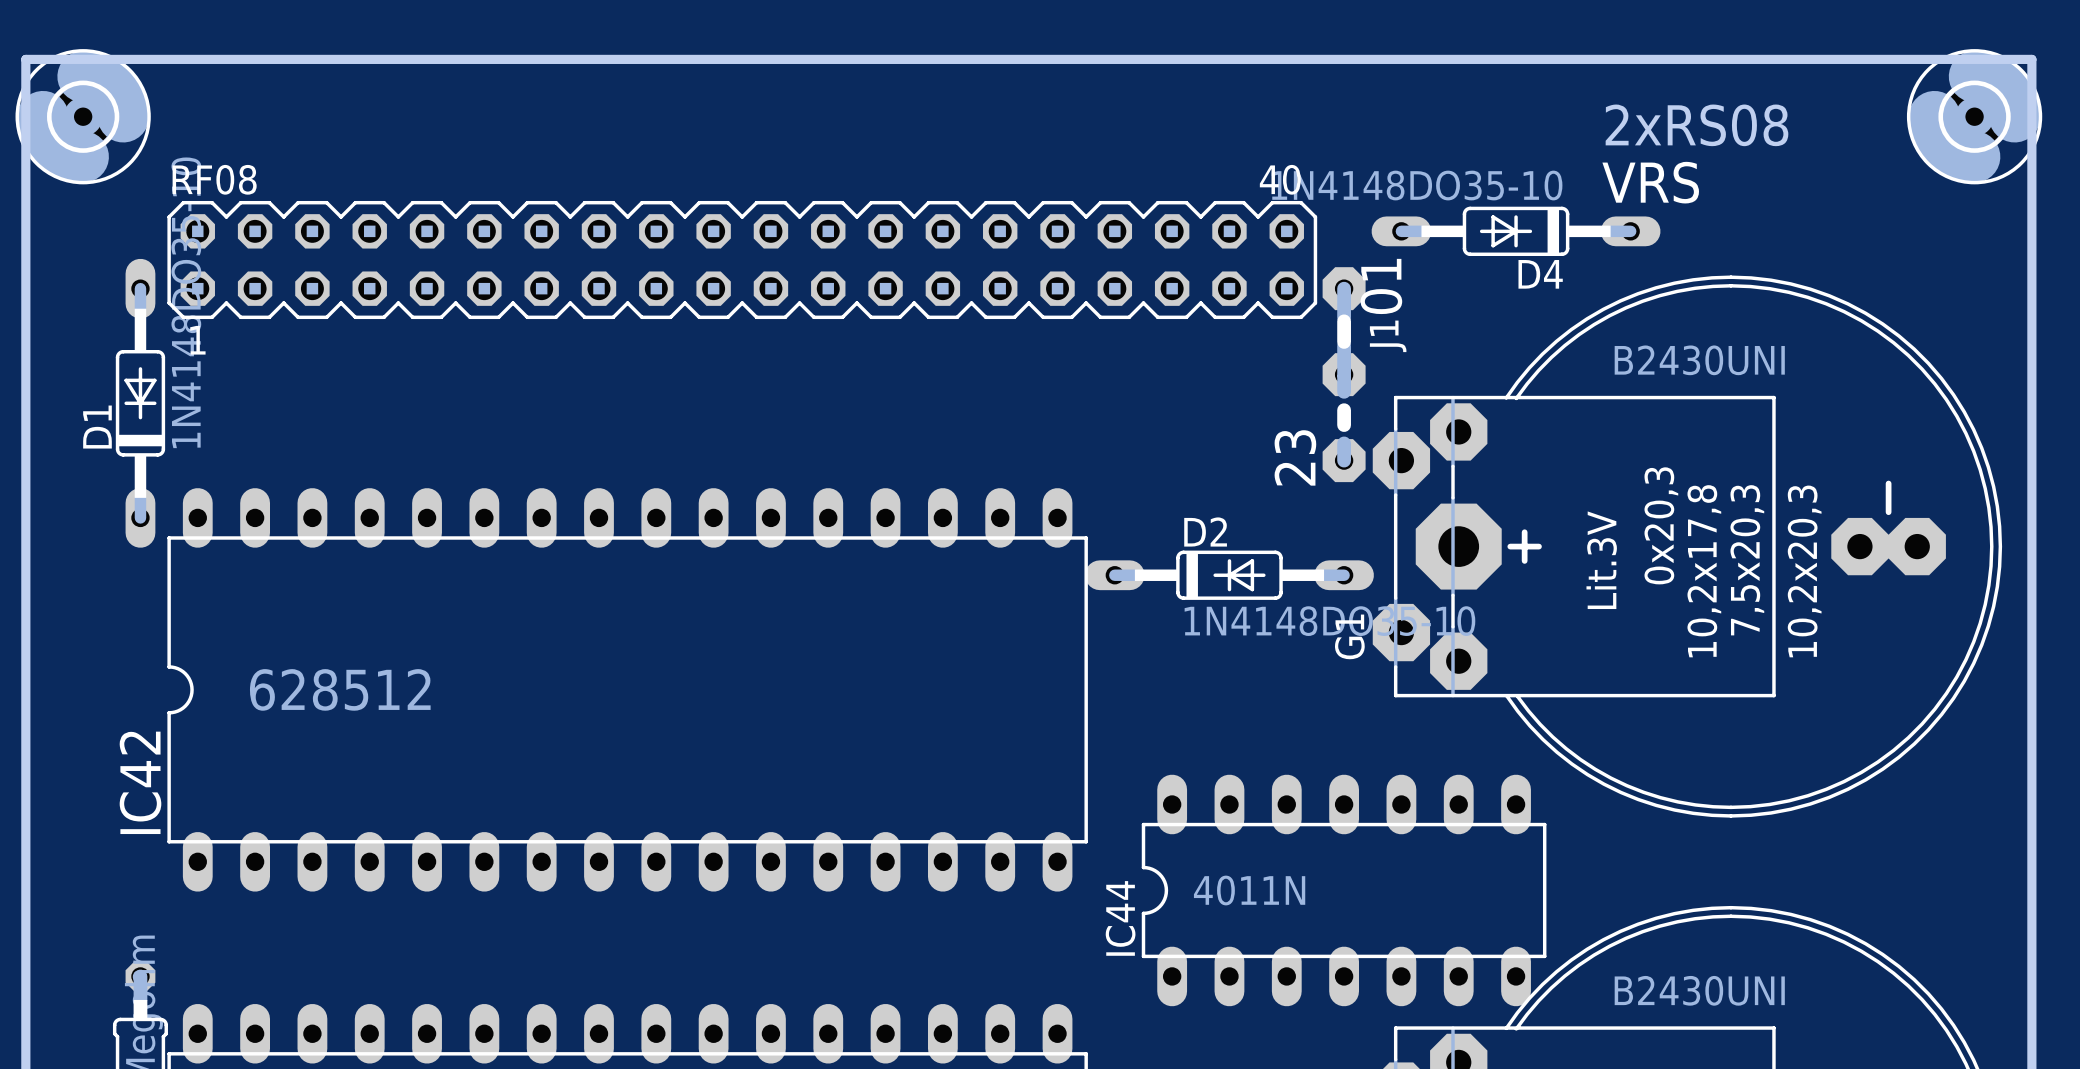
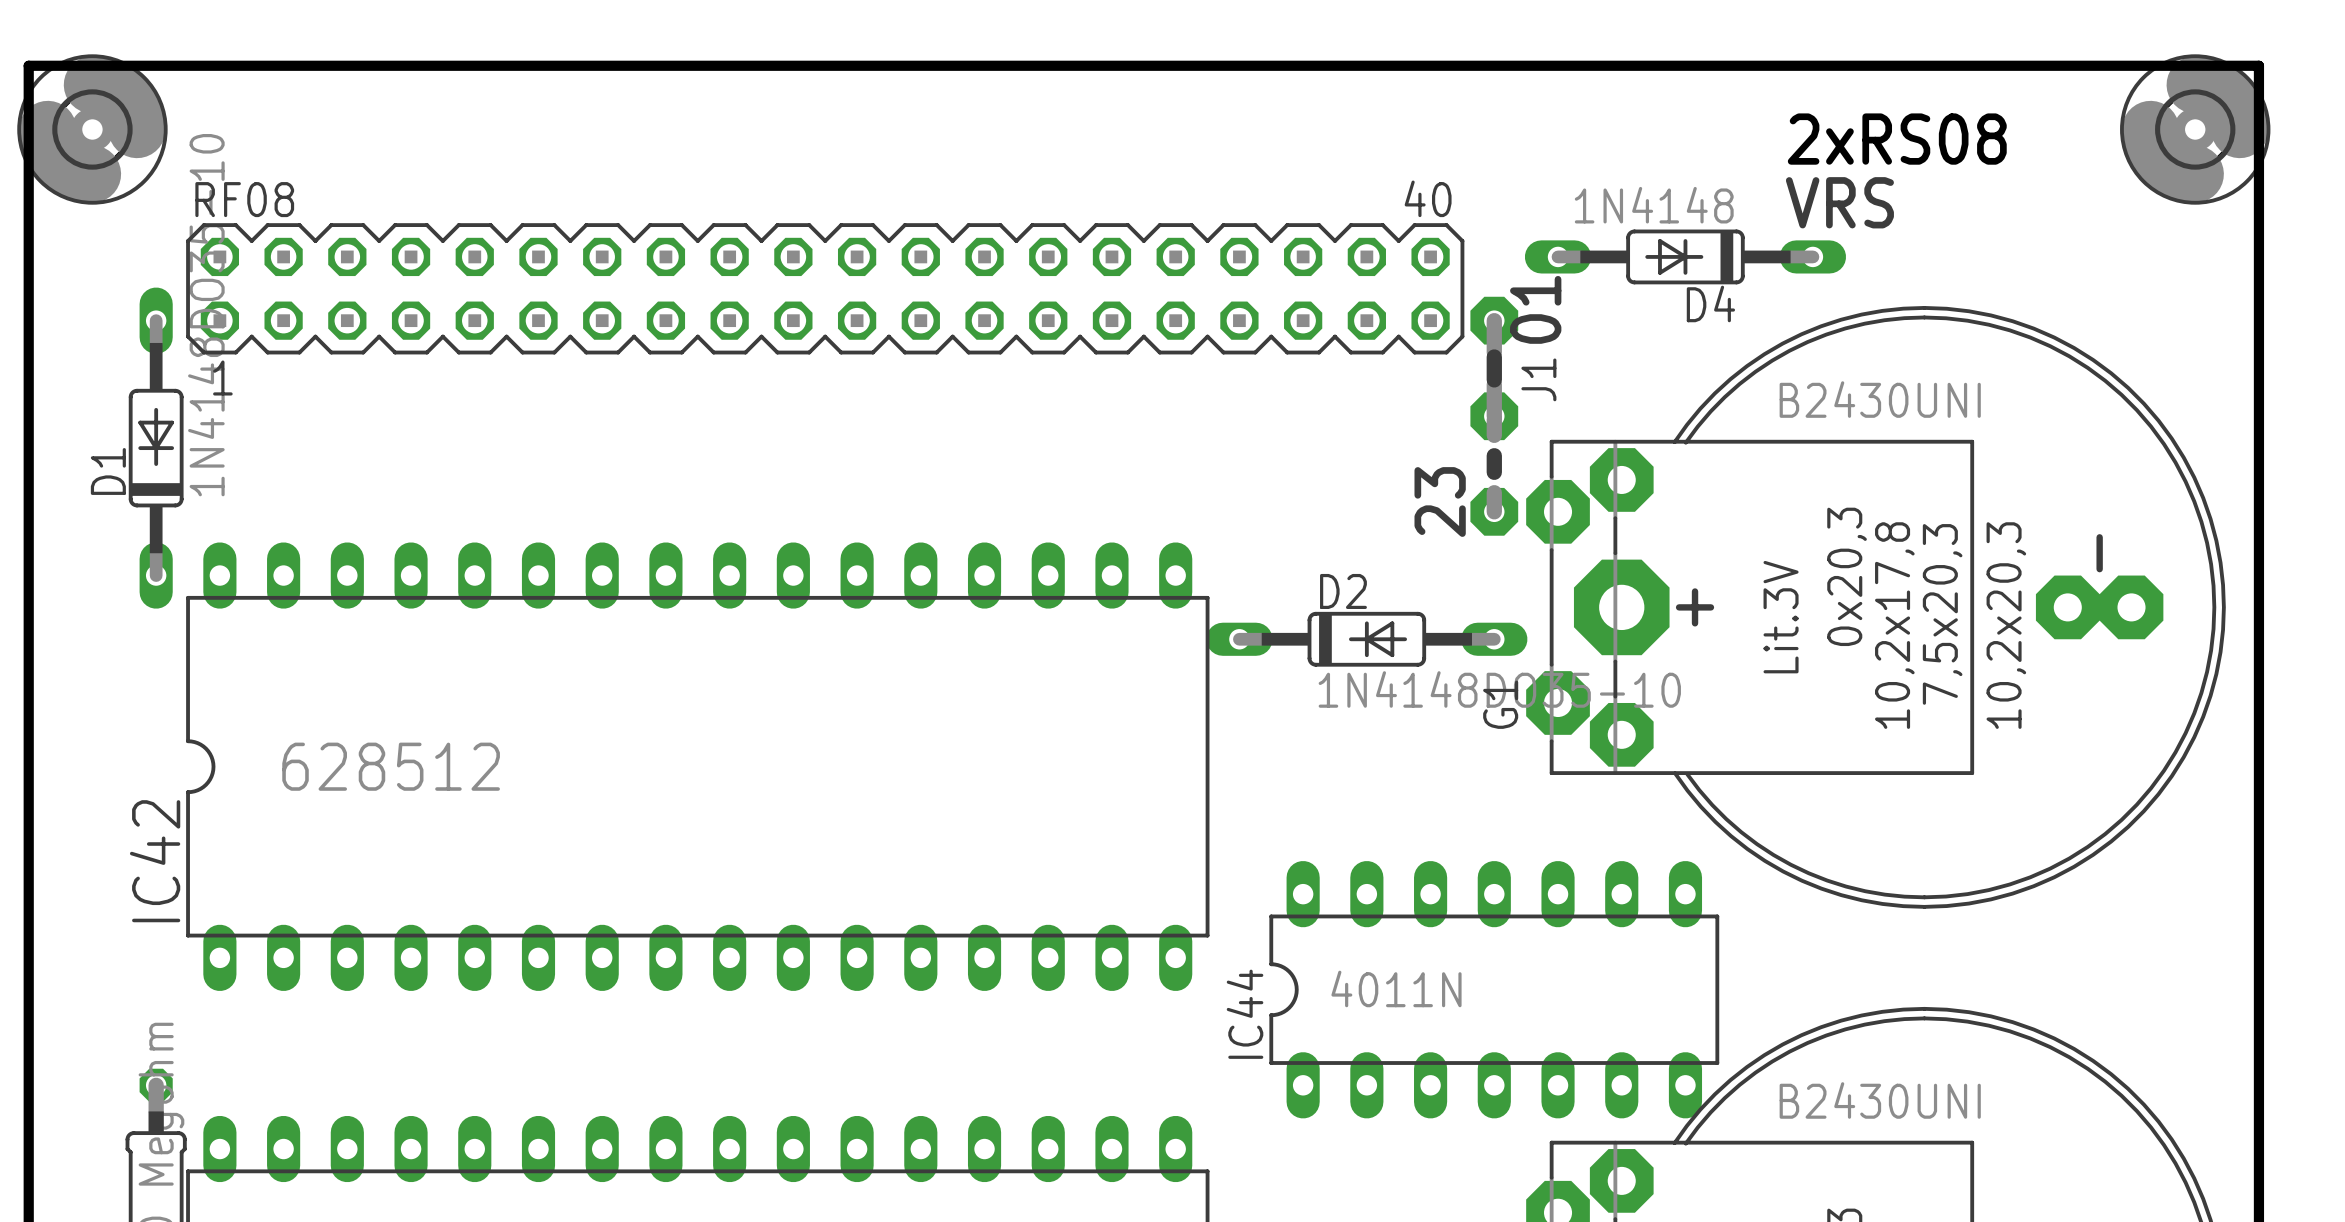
D4 value: 1N4148DO35-10 (1417, 185) -> 1N4148 (1654, 205)

